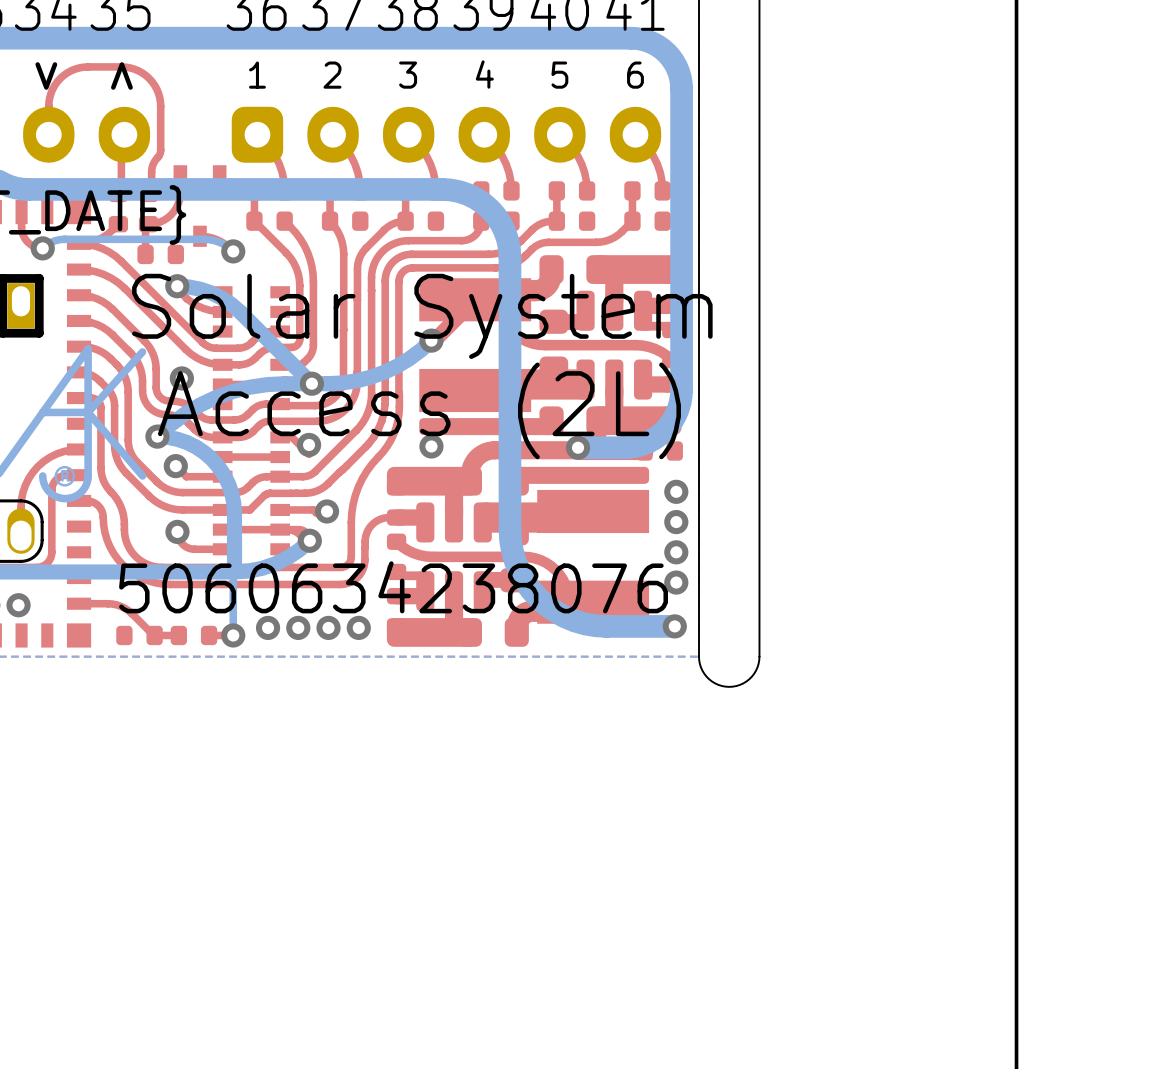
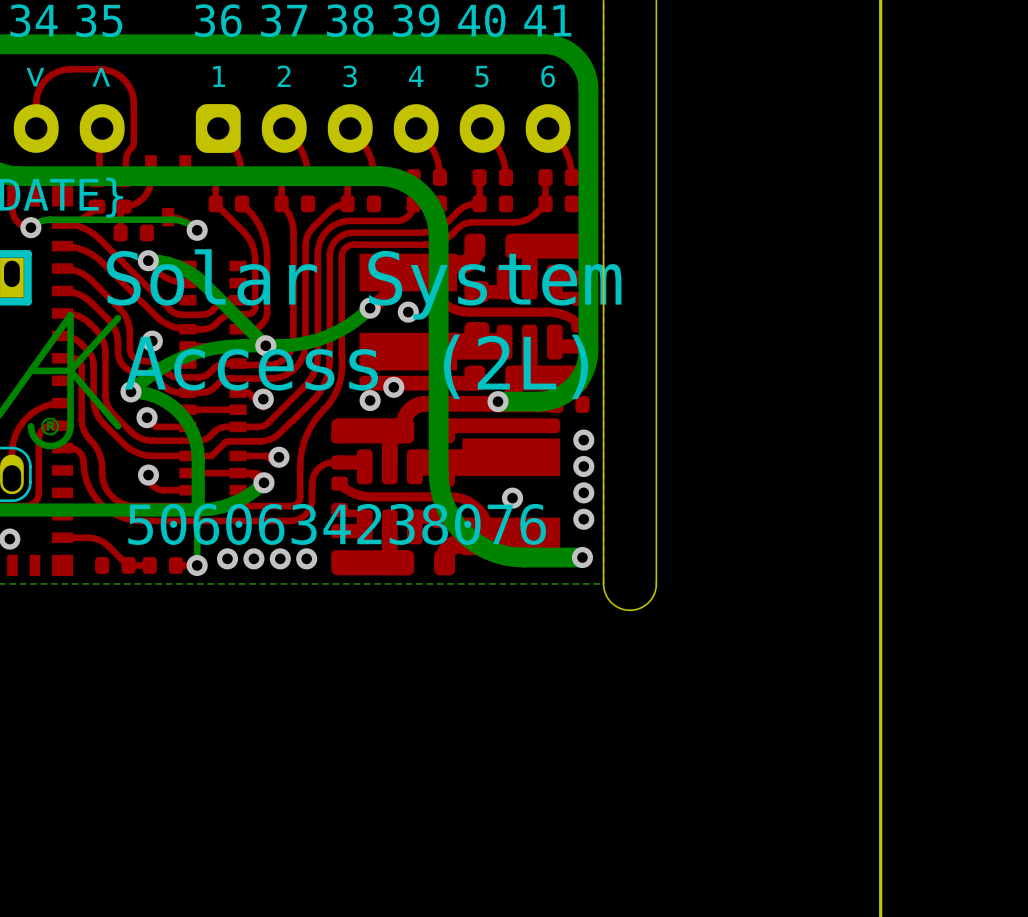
via: none -> (408, 312)
via: none -> (393, 387)
via: none -> (512, 498)

